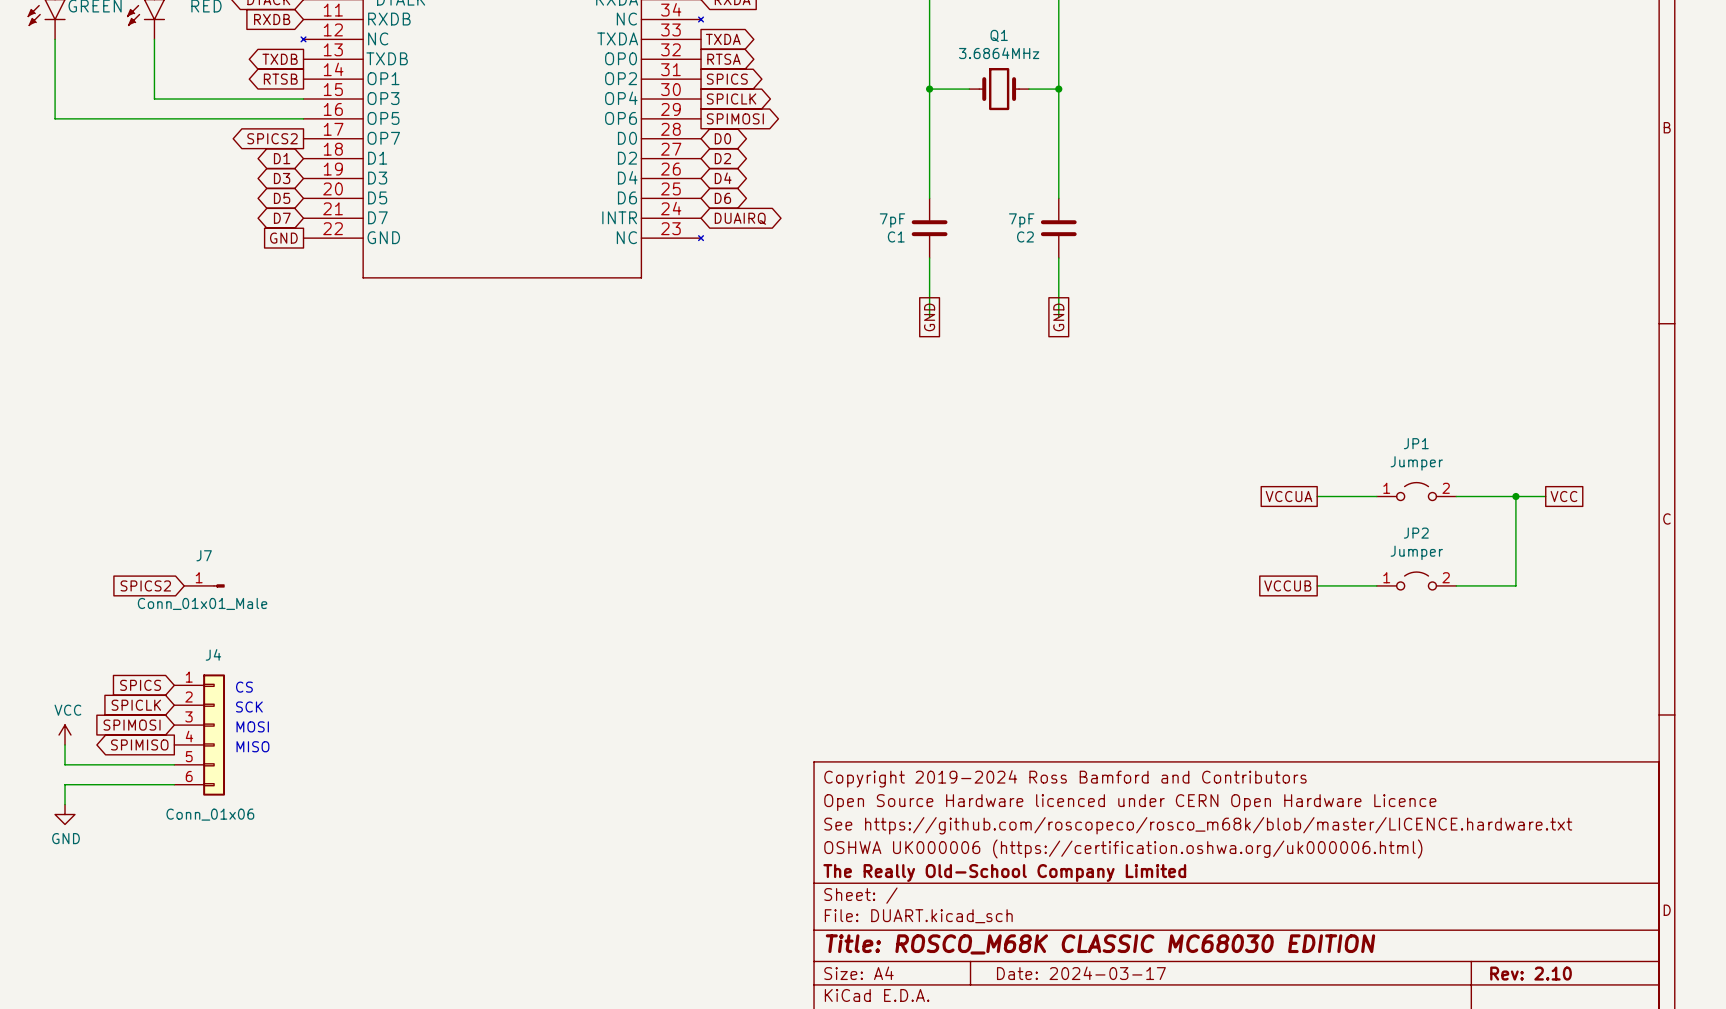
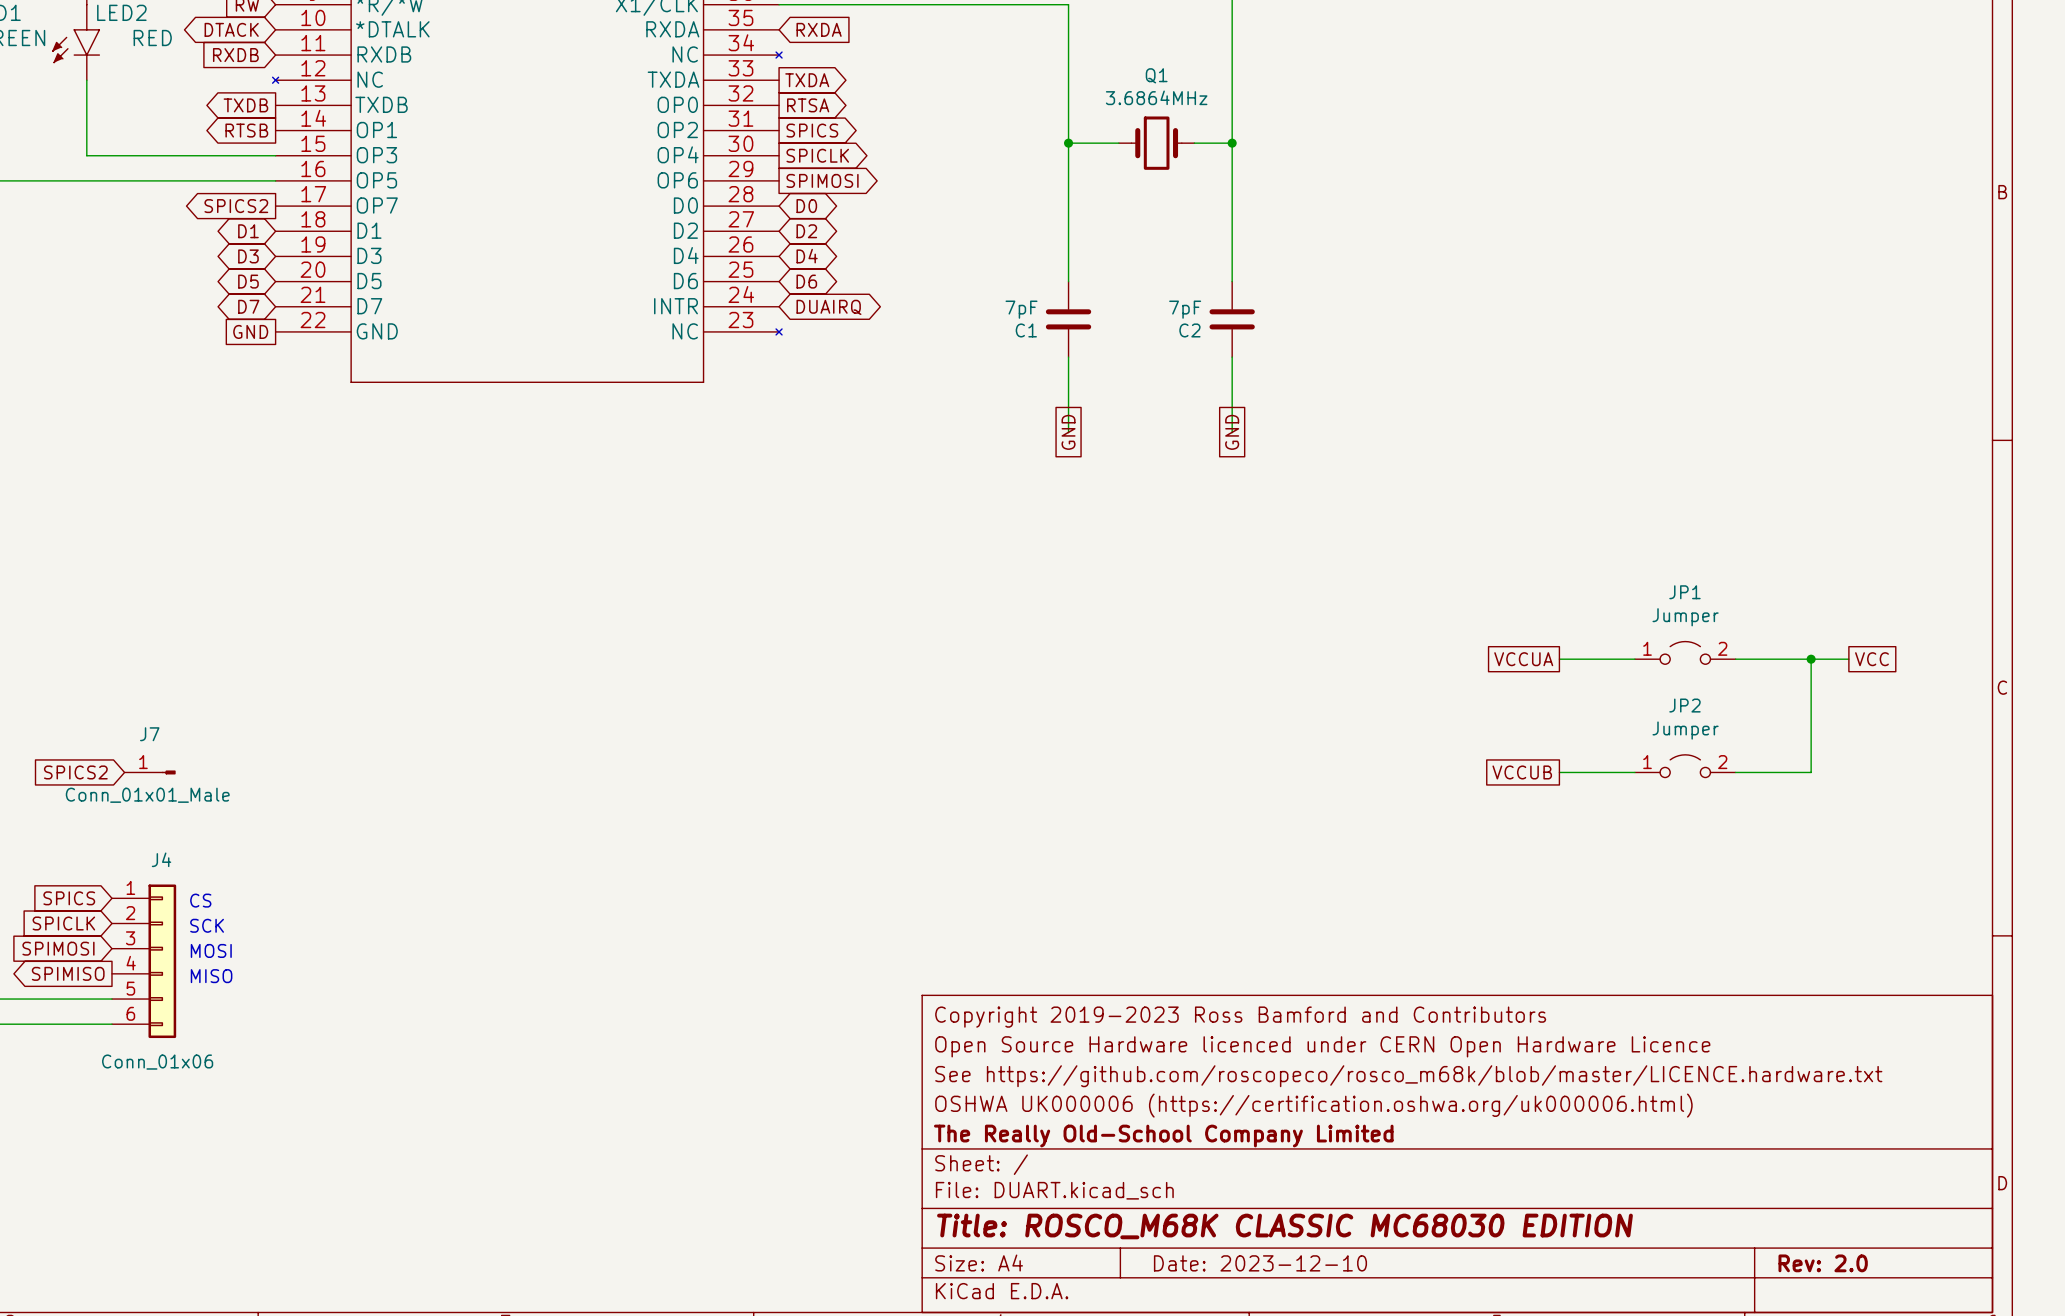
title block: Copyright 2019-2024 Ross Bamford and Contributors (1065, 778) -> Copyright 2019-2023 Ross Bamford and Contributors (1240, 1017)
title block: Date: 2024-03-17 (1081, 973) -> Date: 2023-12-10 (1260, 1263)
title block: Rev: 2.10 (1531, 973) -> Rev: 2.0 (1823, 1263)

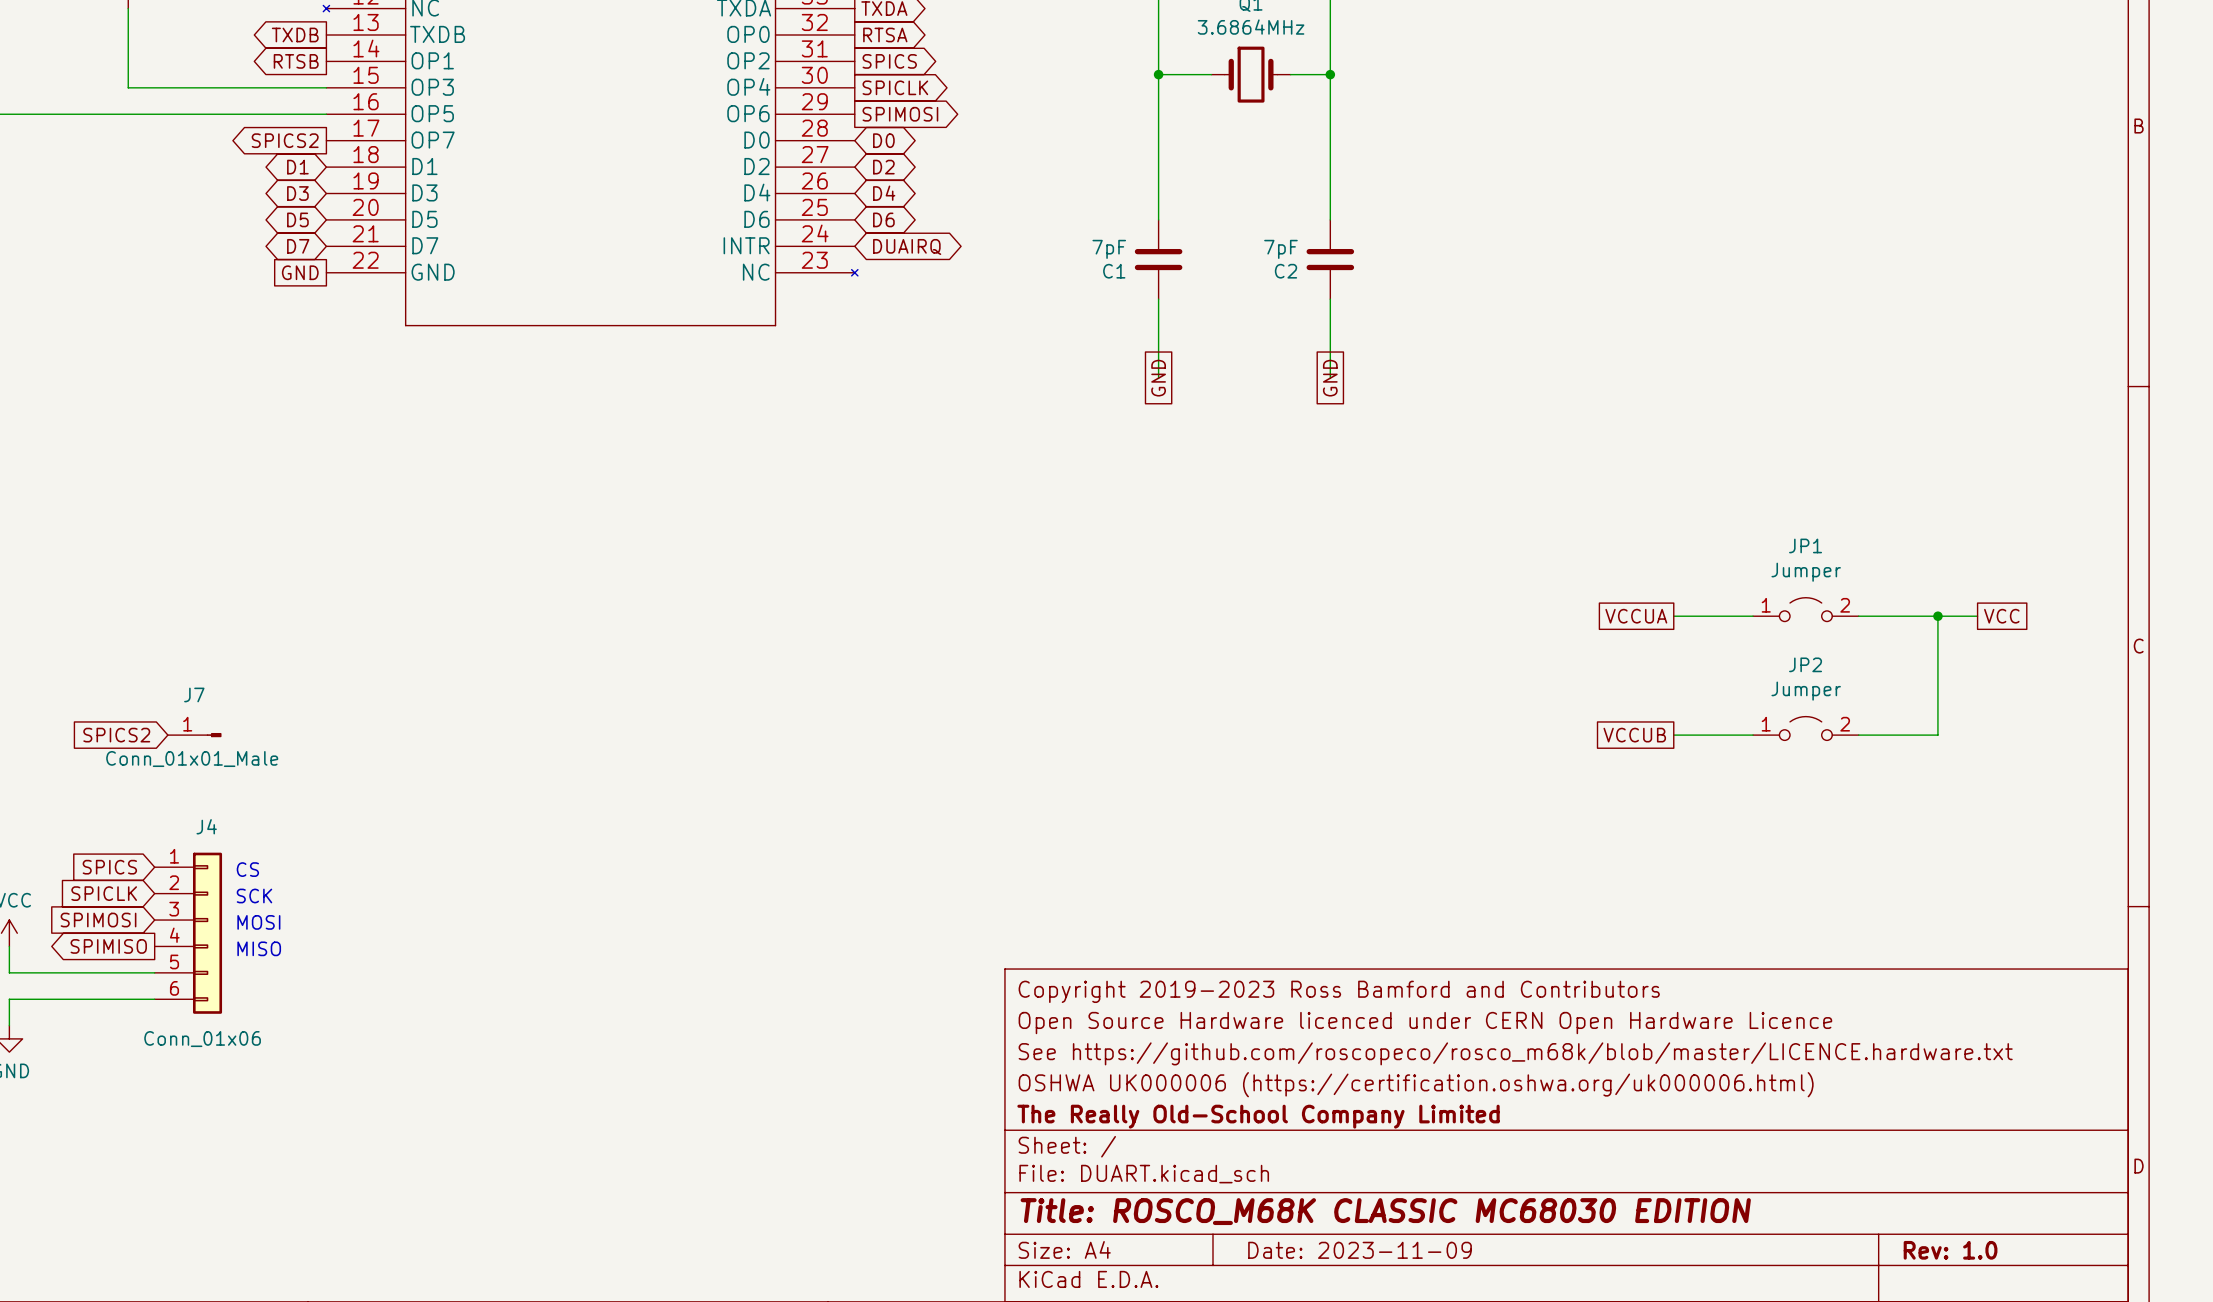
title block: Date: 2023-12-10 (1260, 1263) -> Date: 2023-11-09 (1360, 1250)
title block: Rev: 2.0 (1823, 1263) -> Rev: 1.0 (1950, 1250)

